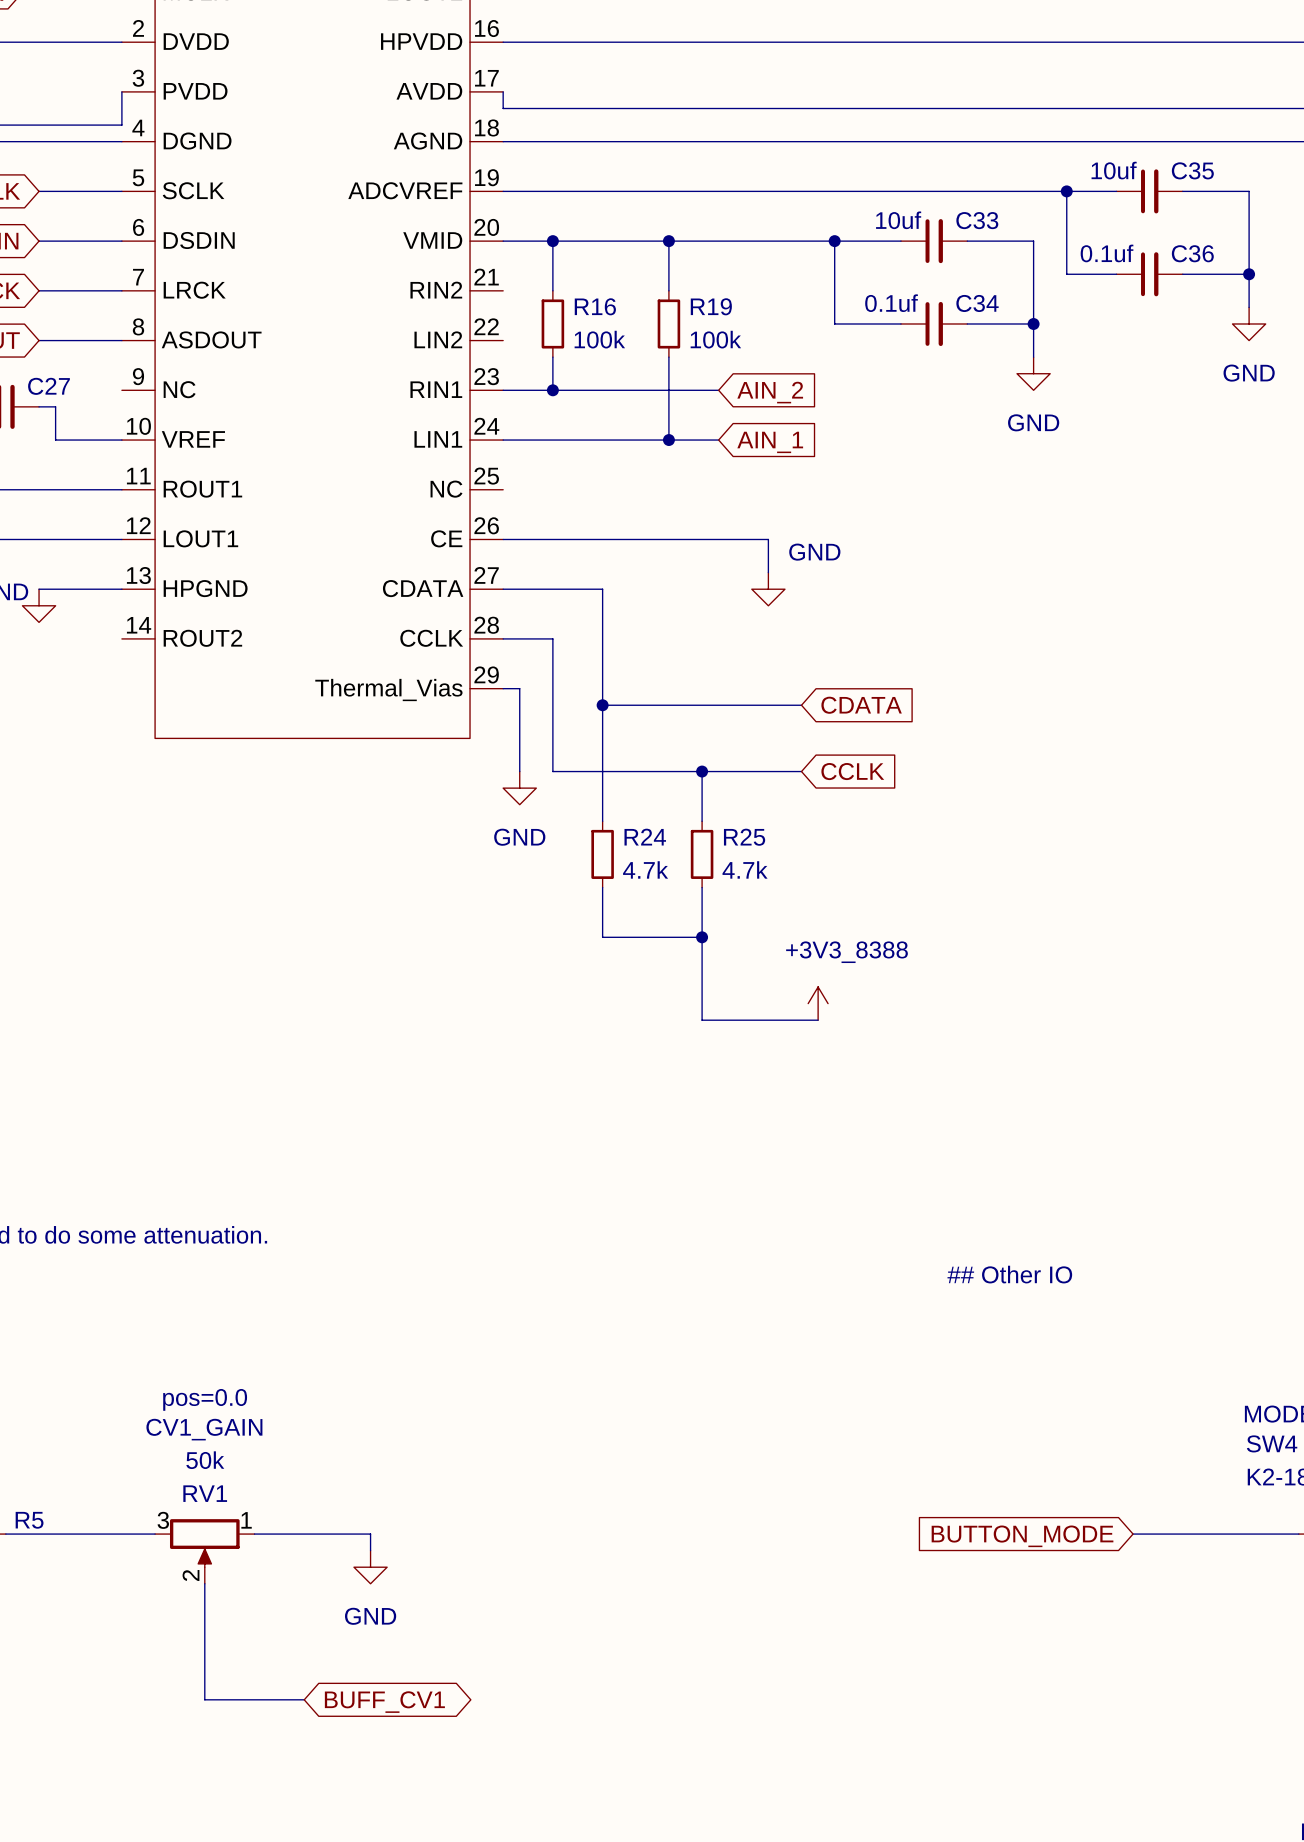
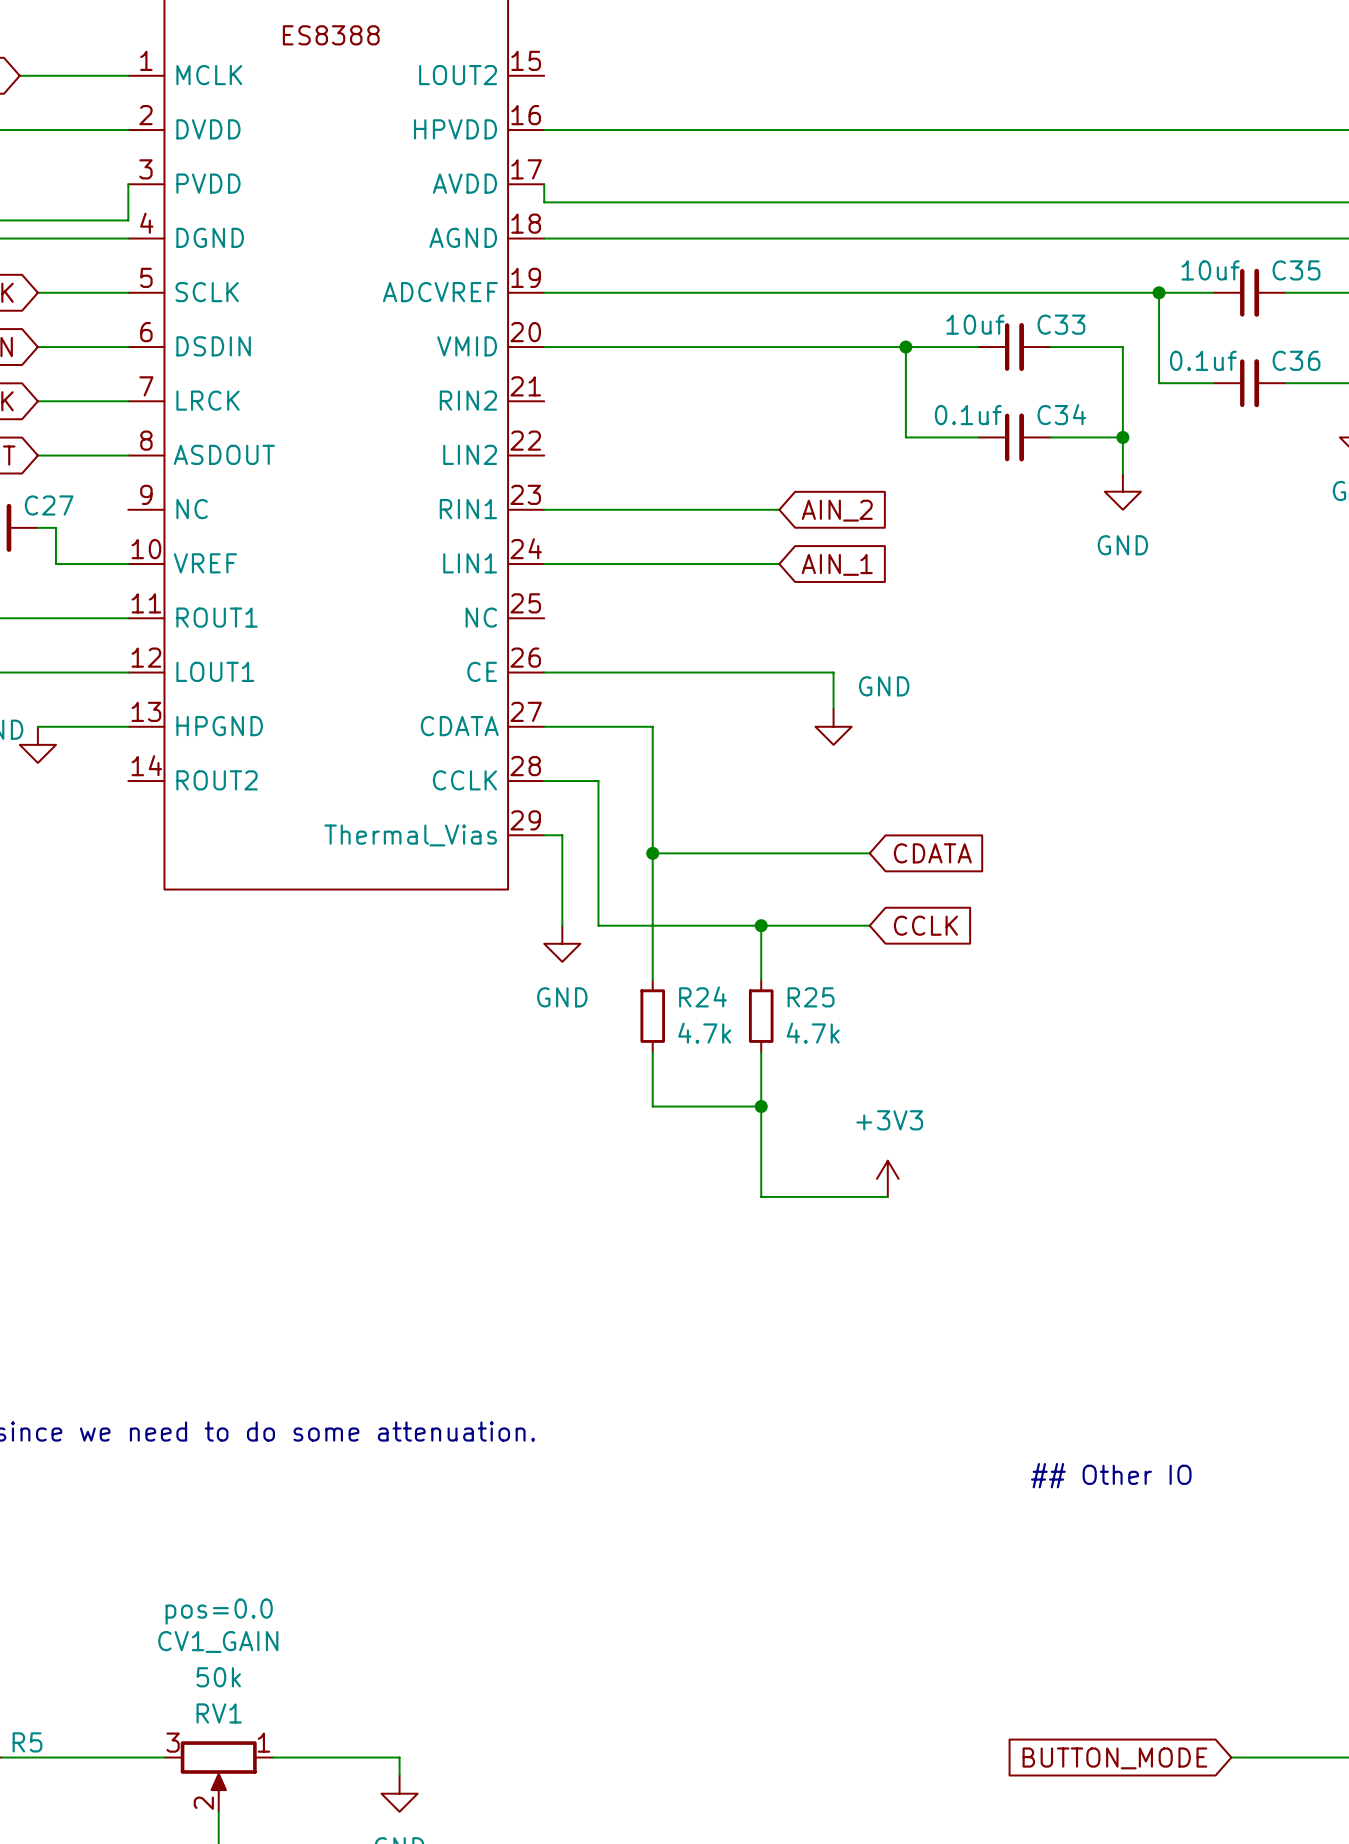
wire: (552, 241) (552, 290) -> none
junction: (552, 241) -> none
wire: (668, 241) (668, 290) -> none
junction: (668, 241) -> none
R16: 100k (552, 323) -> none
R19: 100k (668, 323) -> none
wire: (552, 357) (552, 390) -> none
wire: (668, 357) (668, 440) -> none
junction: (552, 390) -> none
junction: (668, 440) -> none
power symbol: +3V3_8388 (818, 1003) -> +3V3 (887, 1178)

